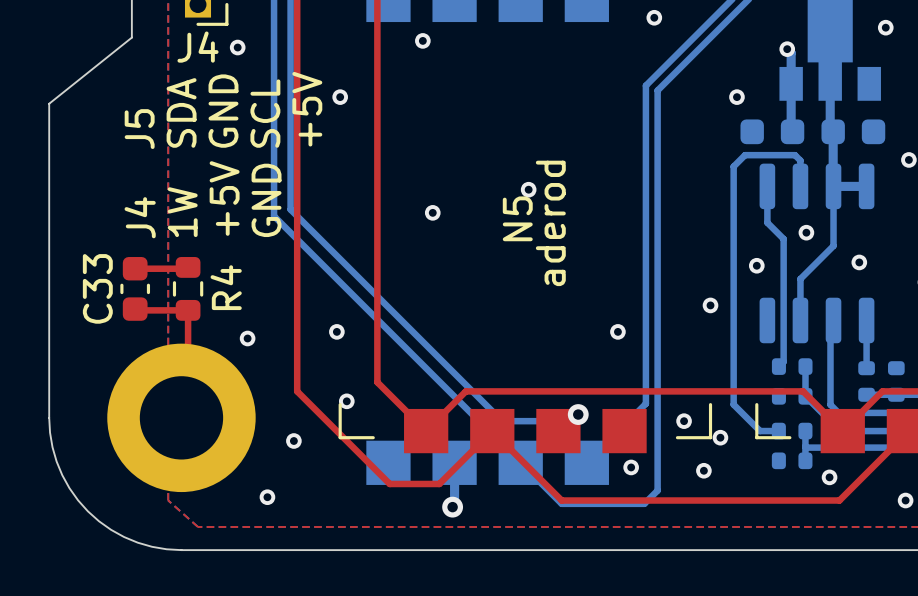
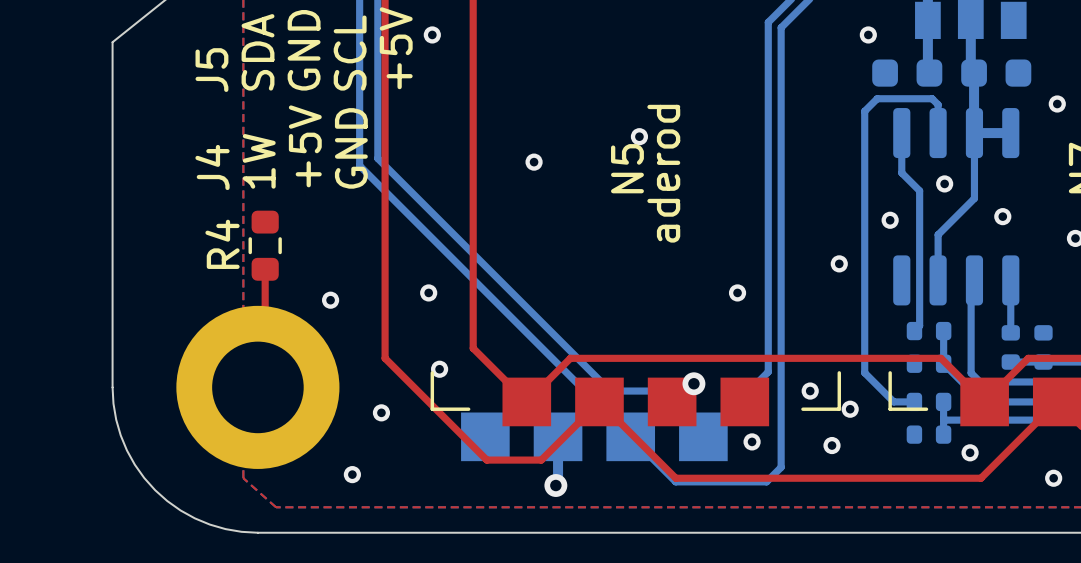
top track: (188, 267) (135, 268) -> none
R4 name position: R4 (226, 287) -> R4 (222, 244)
C33: (135, 288) -> none
top track: (135, 309) (188, 310) -> none

